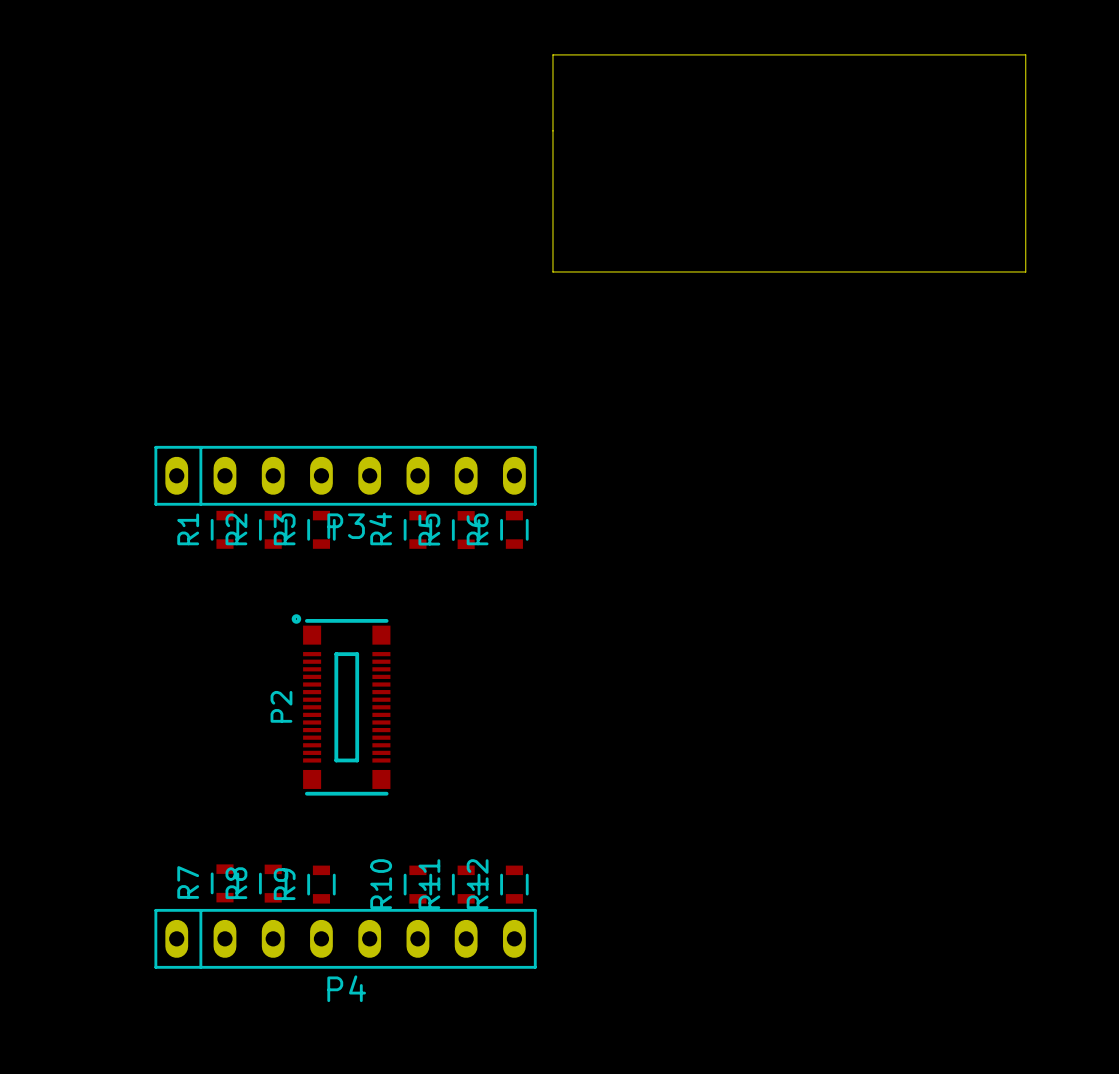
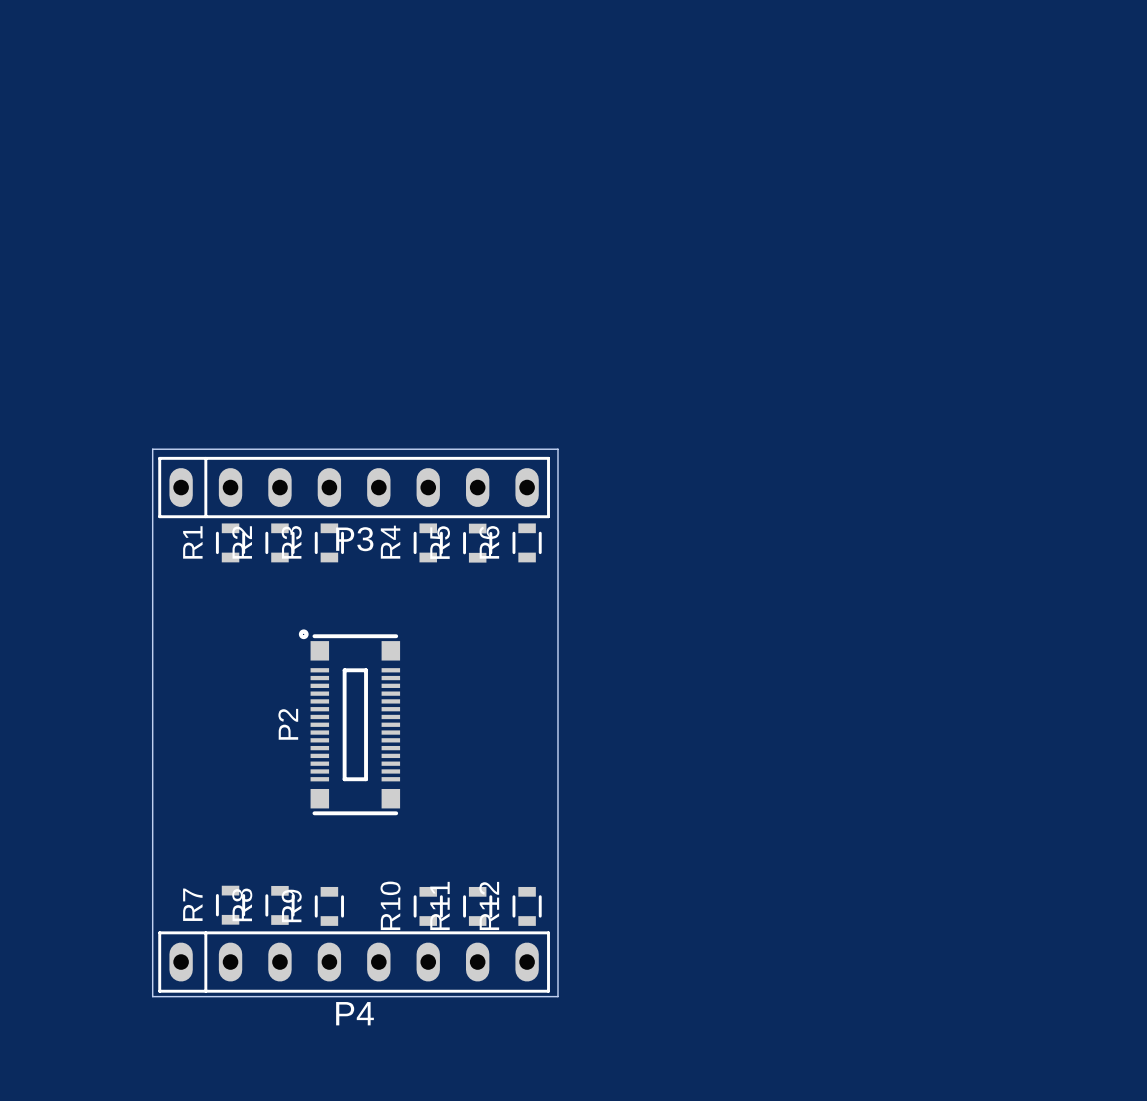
board edge: (552, 54) (552, 271) (1025, 271) (1025, 54) (552, 54) -> none
board edge: none -> (152, 449) (557, 449) (557, 996) (152, 996) (152, 449)

